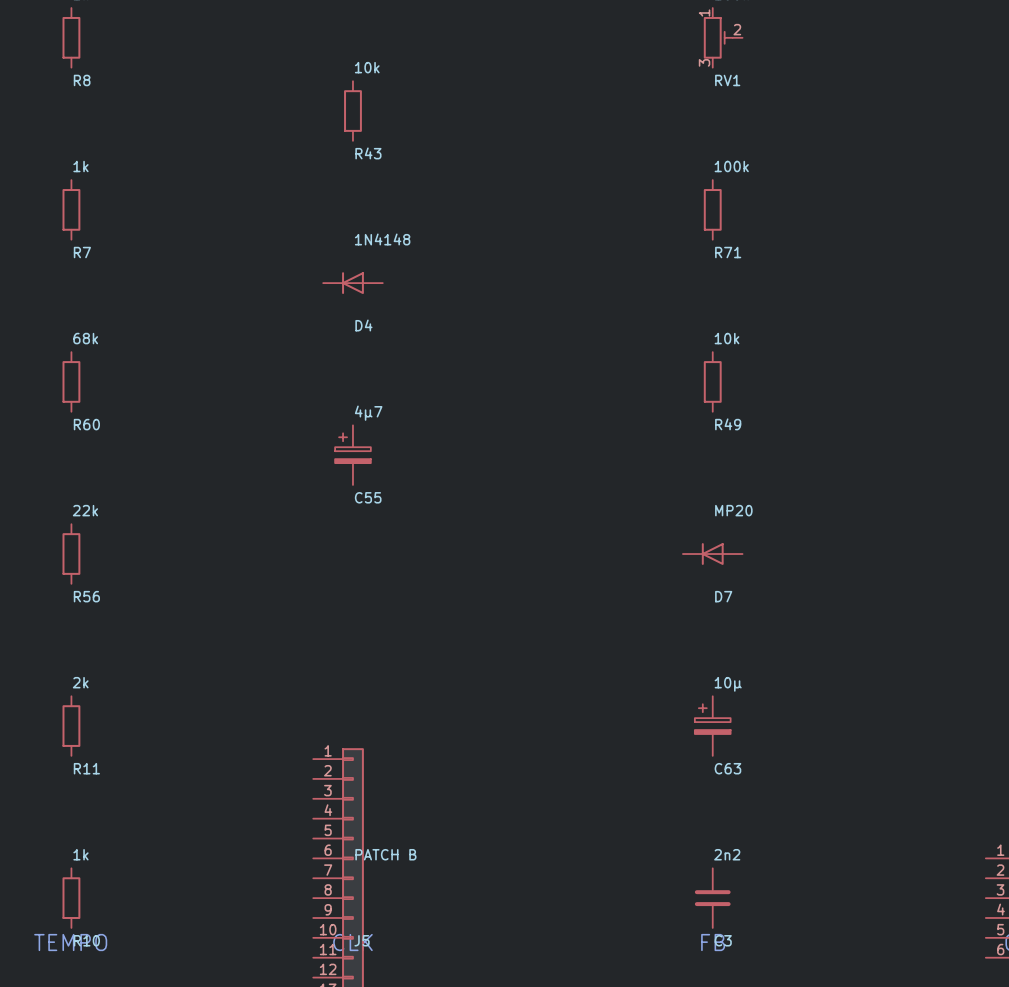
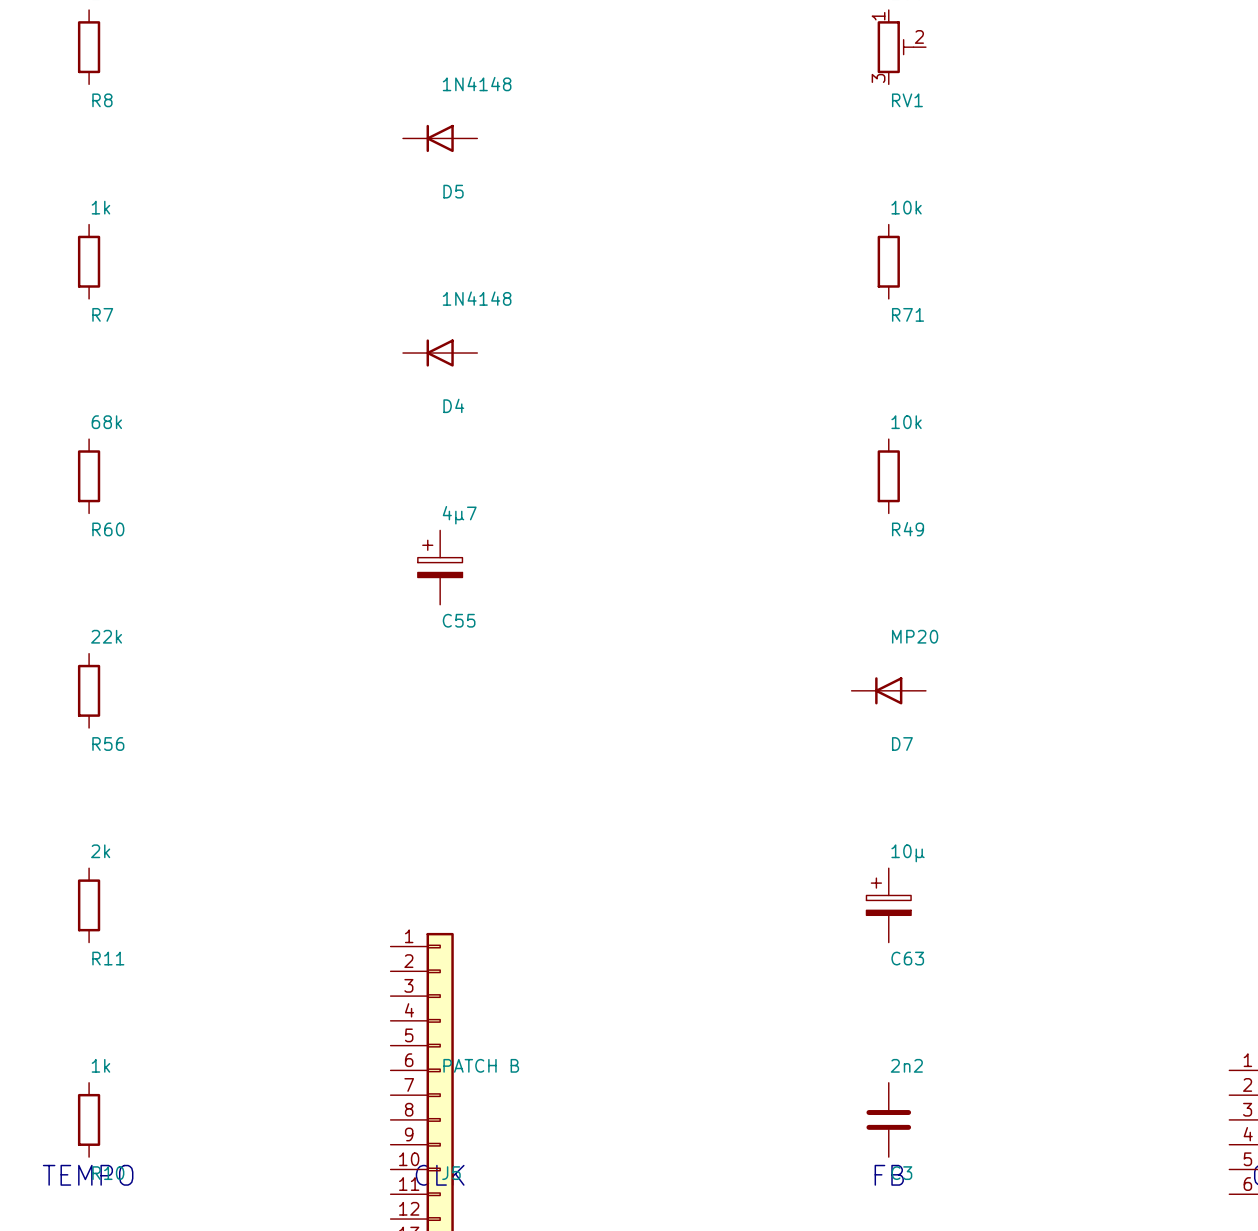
R43: 10k (352, 111) -> none
D5: none -> 1N4148 (440, 138)
R71 value: 100k (731, 166) -> 10k (906, 207)

